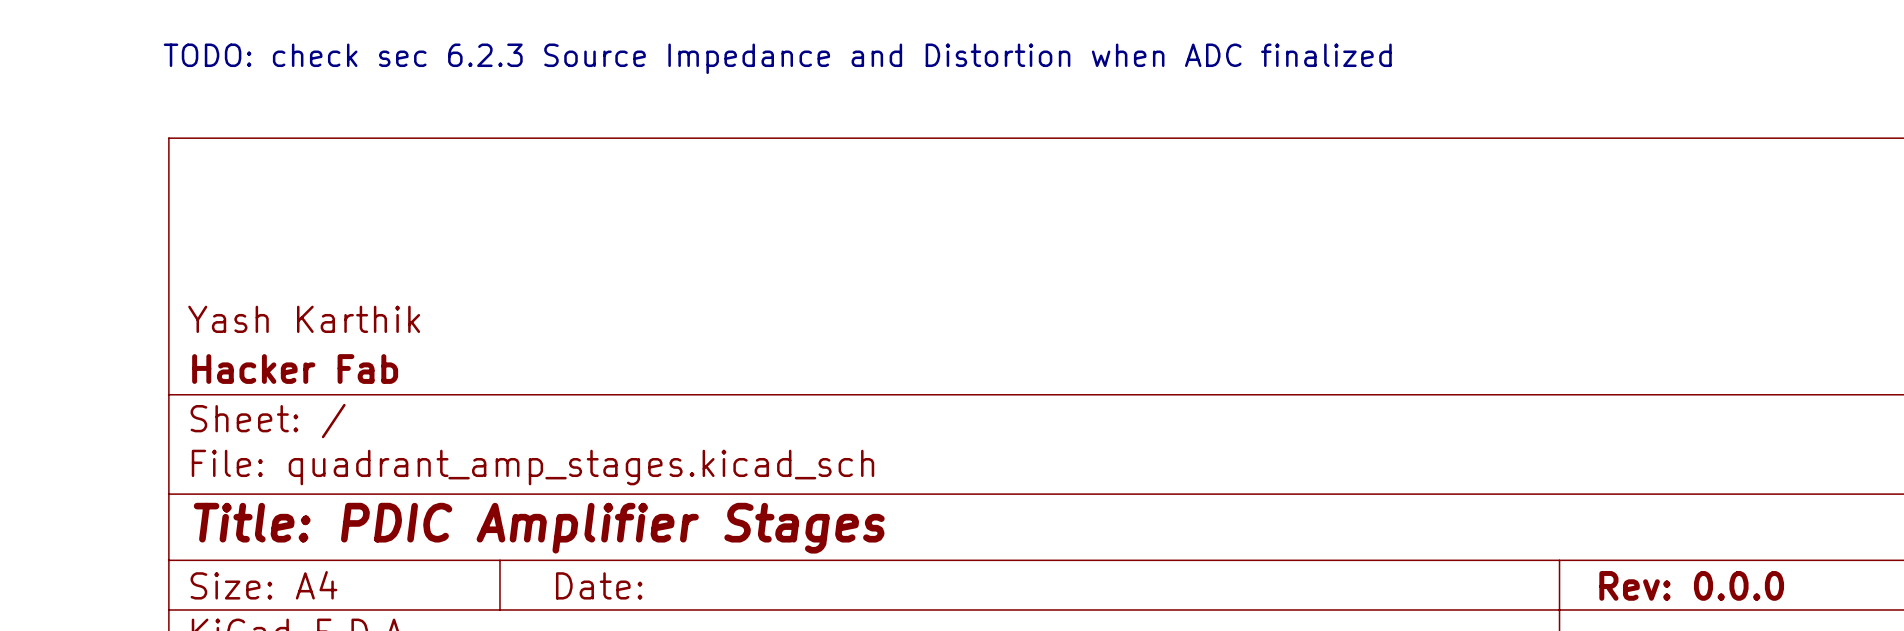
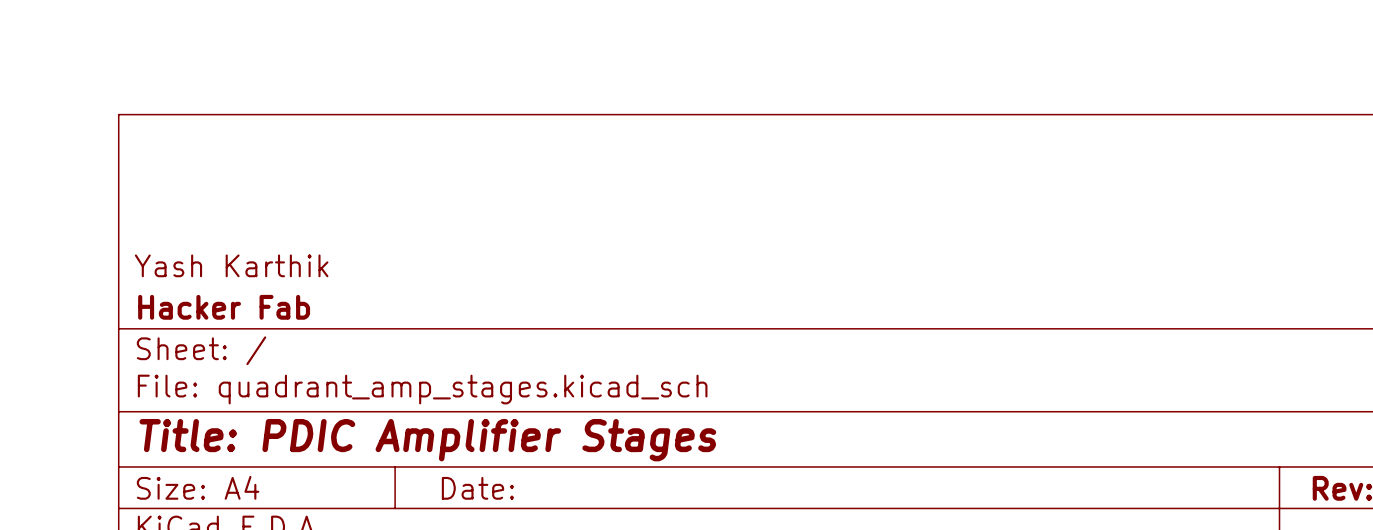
text: TODO: check sec 6.2.3 Source Impedance and Distortion when ADC finalized (777, 58) -> none

